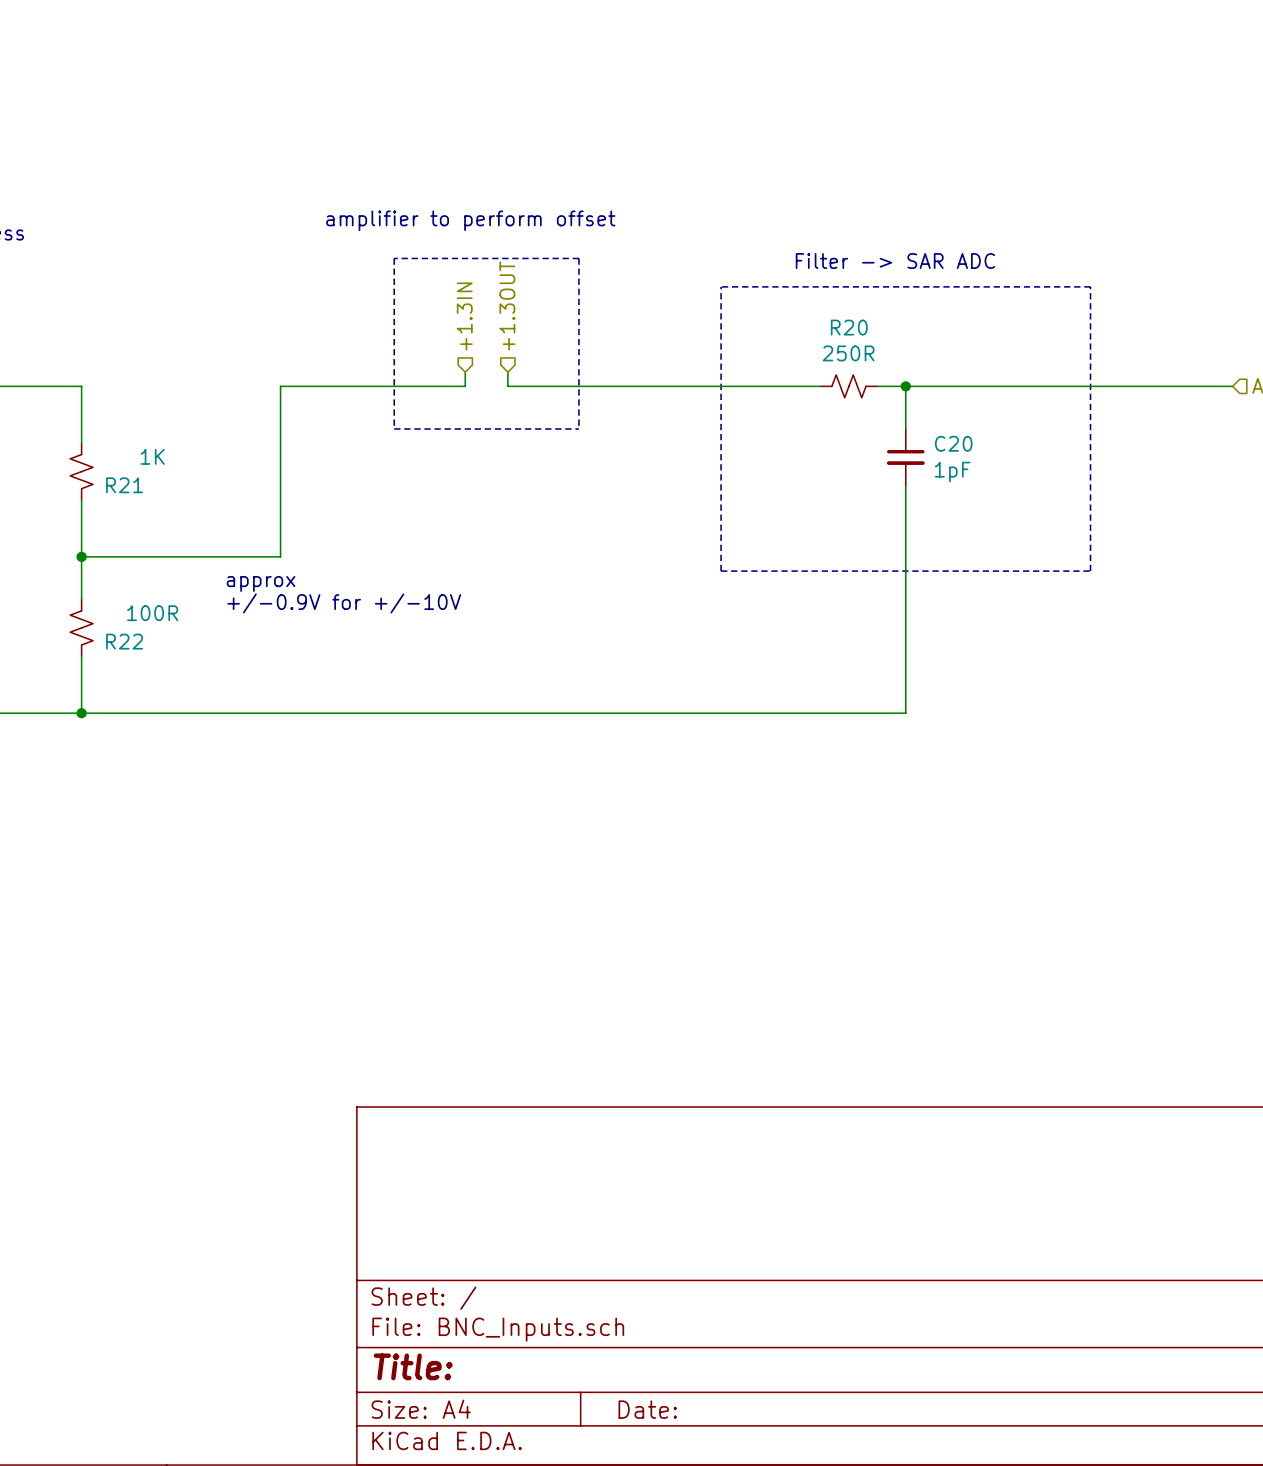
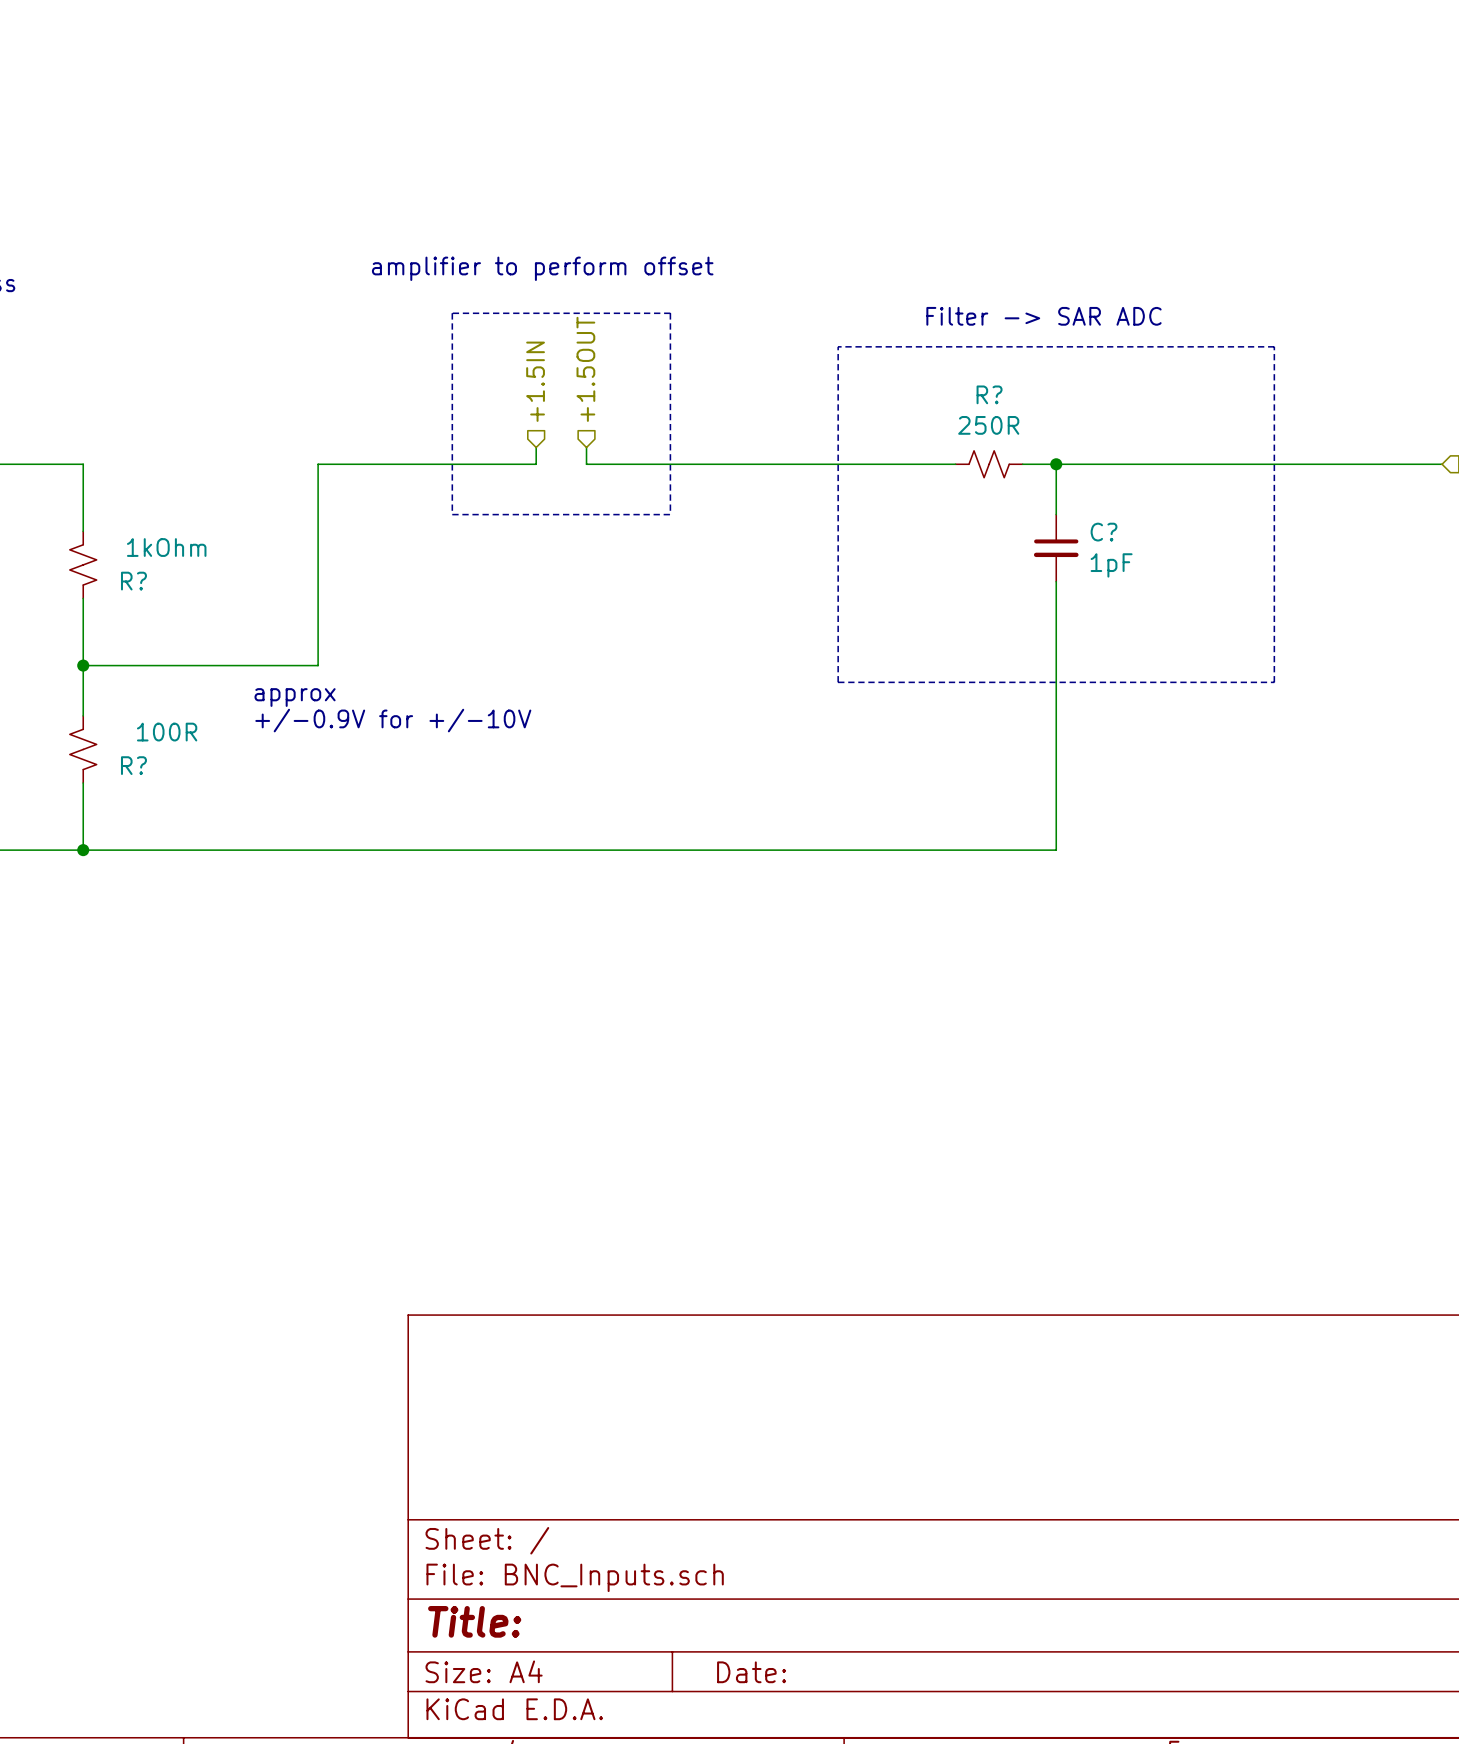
hierarchical label: +1.3OUT (507, 305) -> +1.5OUT (585, 369)
hierarchical label: +1.3IN (464, 316) -> +1.5IN (535, 381)
R20 name: R20 (849, 327) -> R? (989, 394)
C20 name: C20 (953, 443) -> C? (1104, 532)
R21 value: 1K (152, 456) -> 1kOhm (166, 547)
R21 name: R21 (124, 485) -> R? (133, 581)
R22 name: R22 (124, 641) -> R? (133, 765)

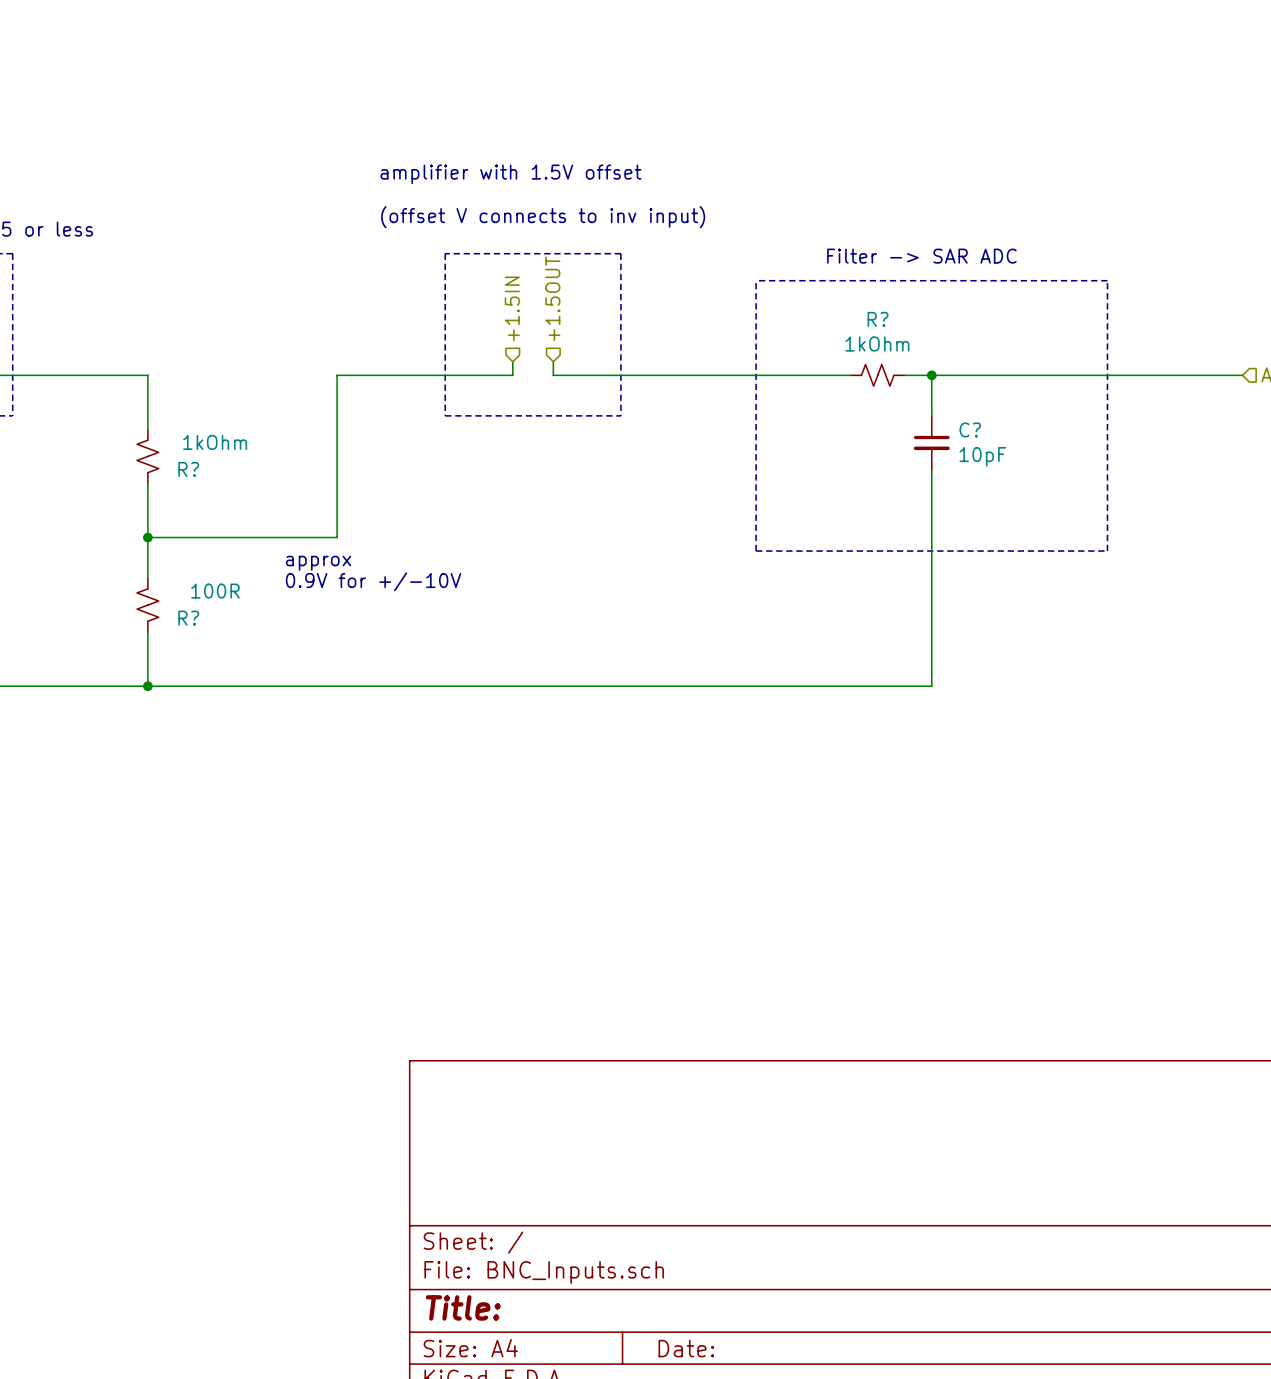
text: none -> amplifier with 1.5V offset (510, 174)
text: amplifier to perform offset (542, 268) -> (offset V connects to inv input) (543, 217)
R? value: 250R (988, 425) -> 1kOhm (877, 344)
C? value: 1pF (1111, 565) -> 10pF (982, 456)
text: +/-0.9V for +/-10V (393, 720) -> 0.9V for +/-10V (373, 581)

